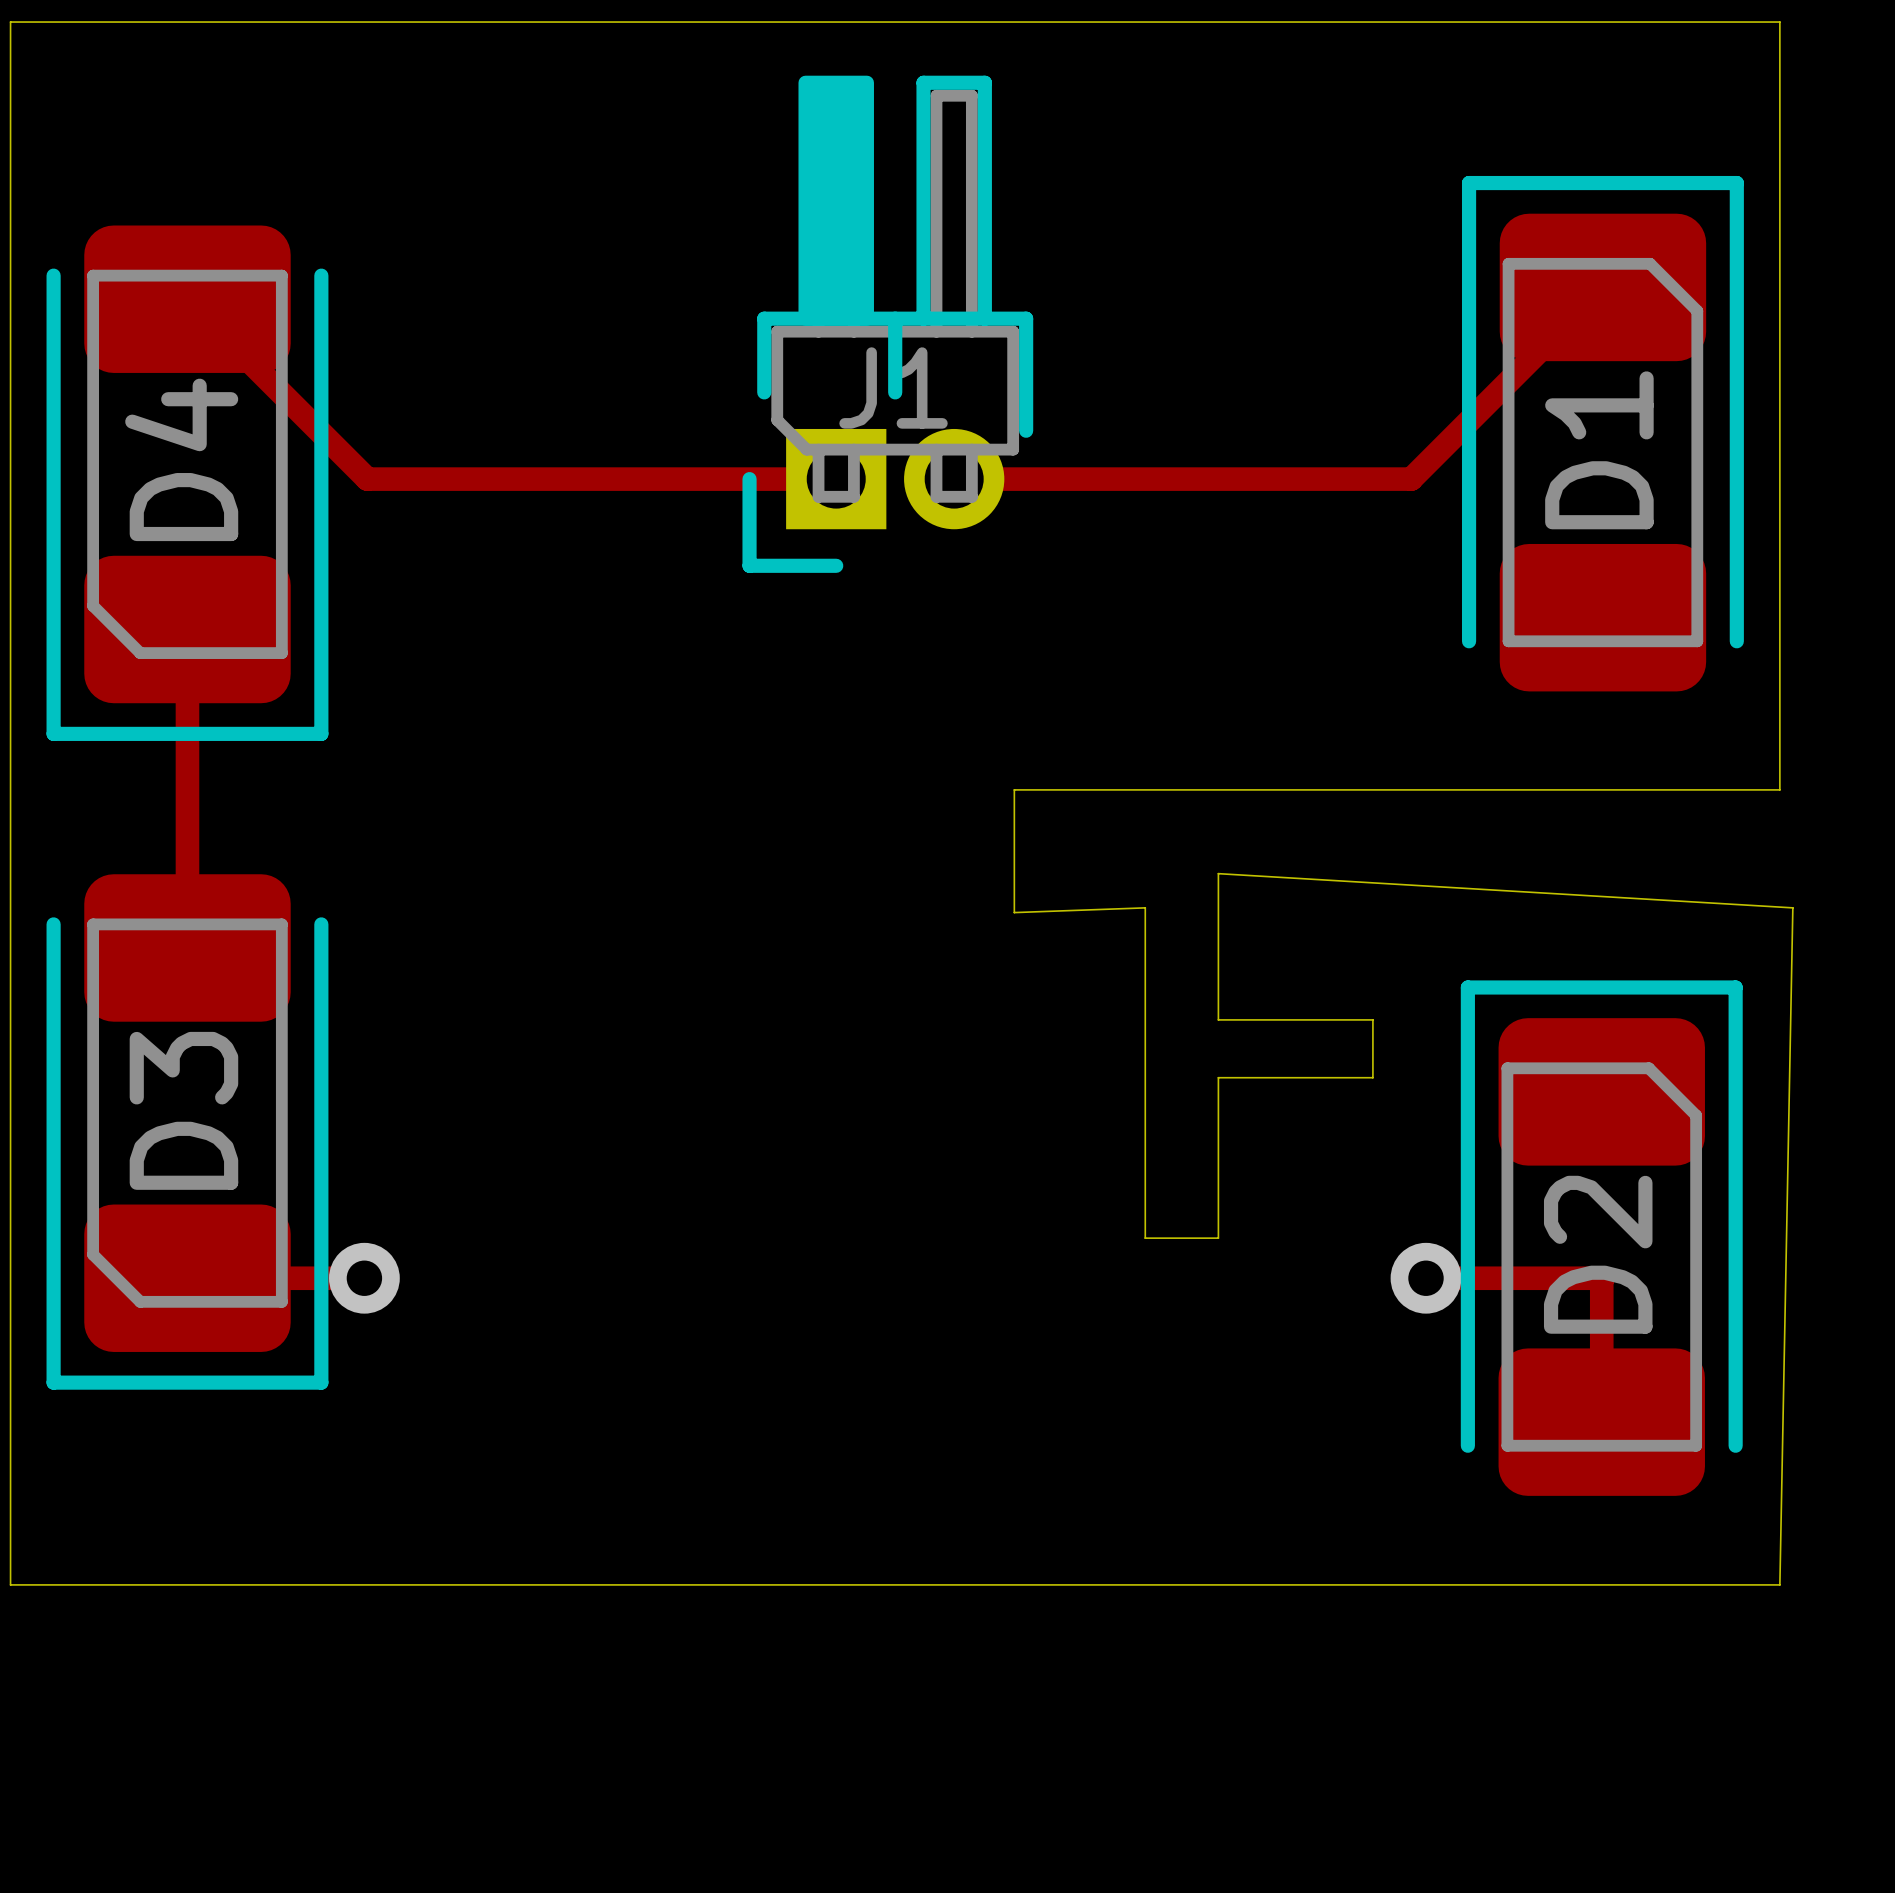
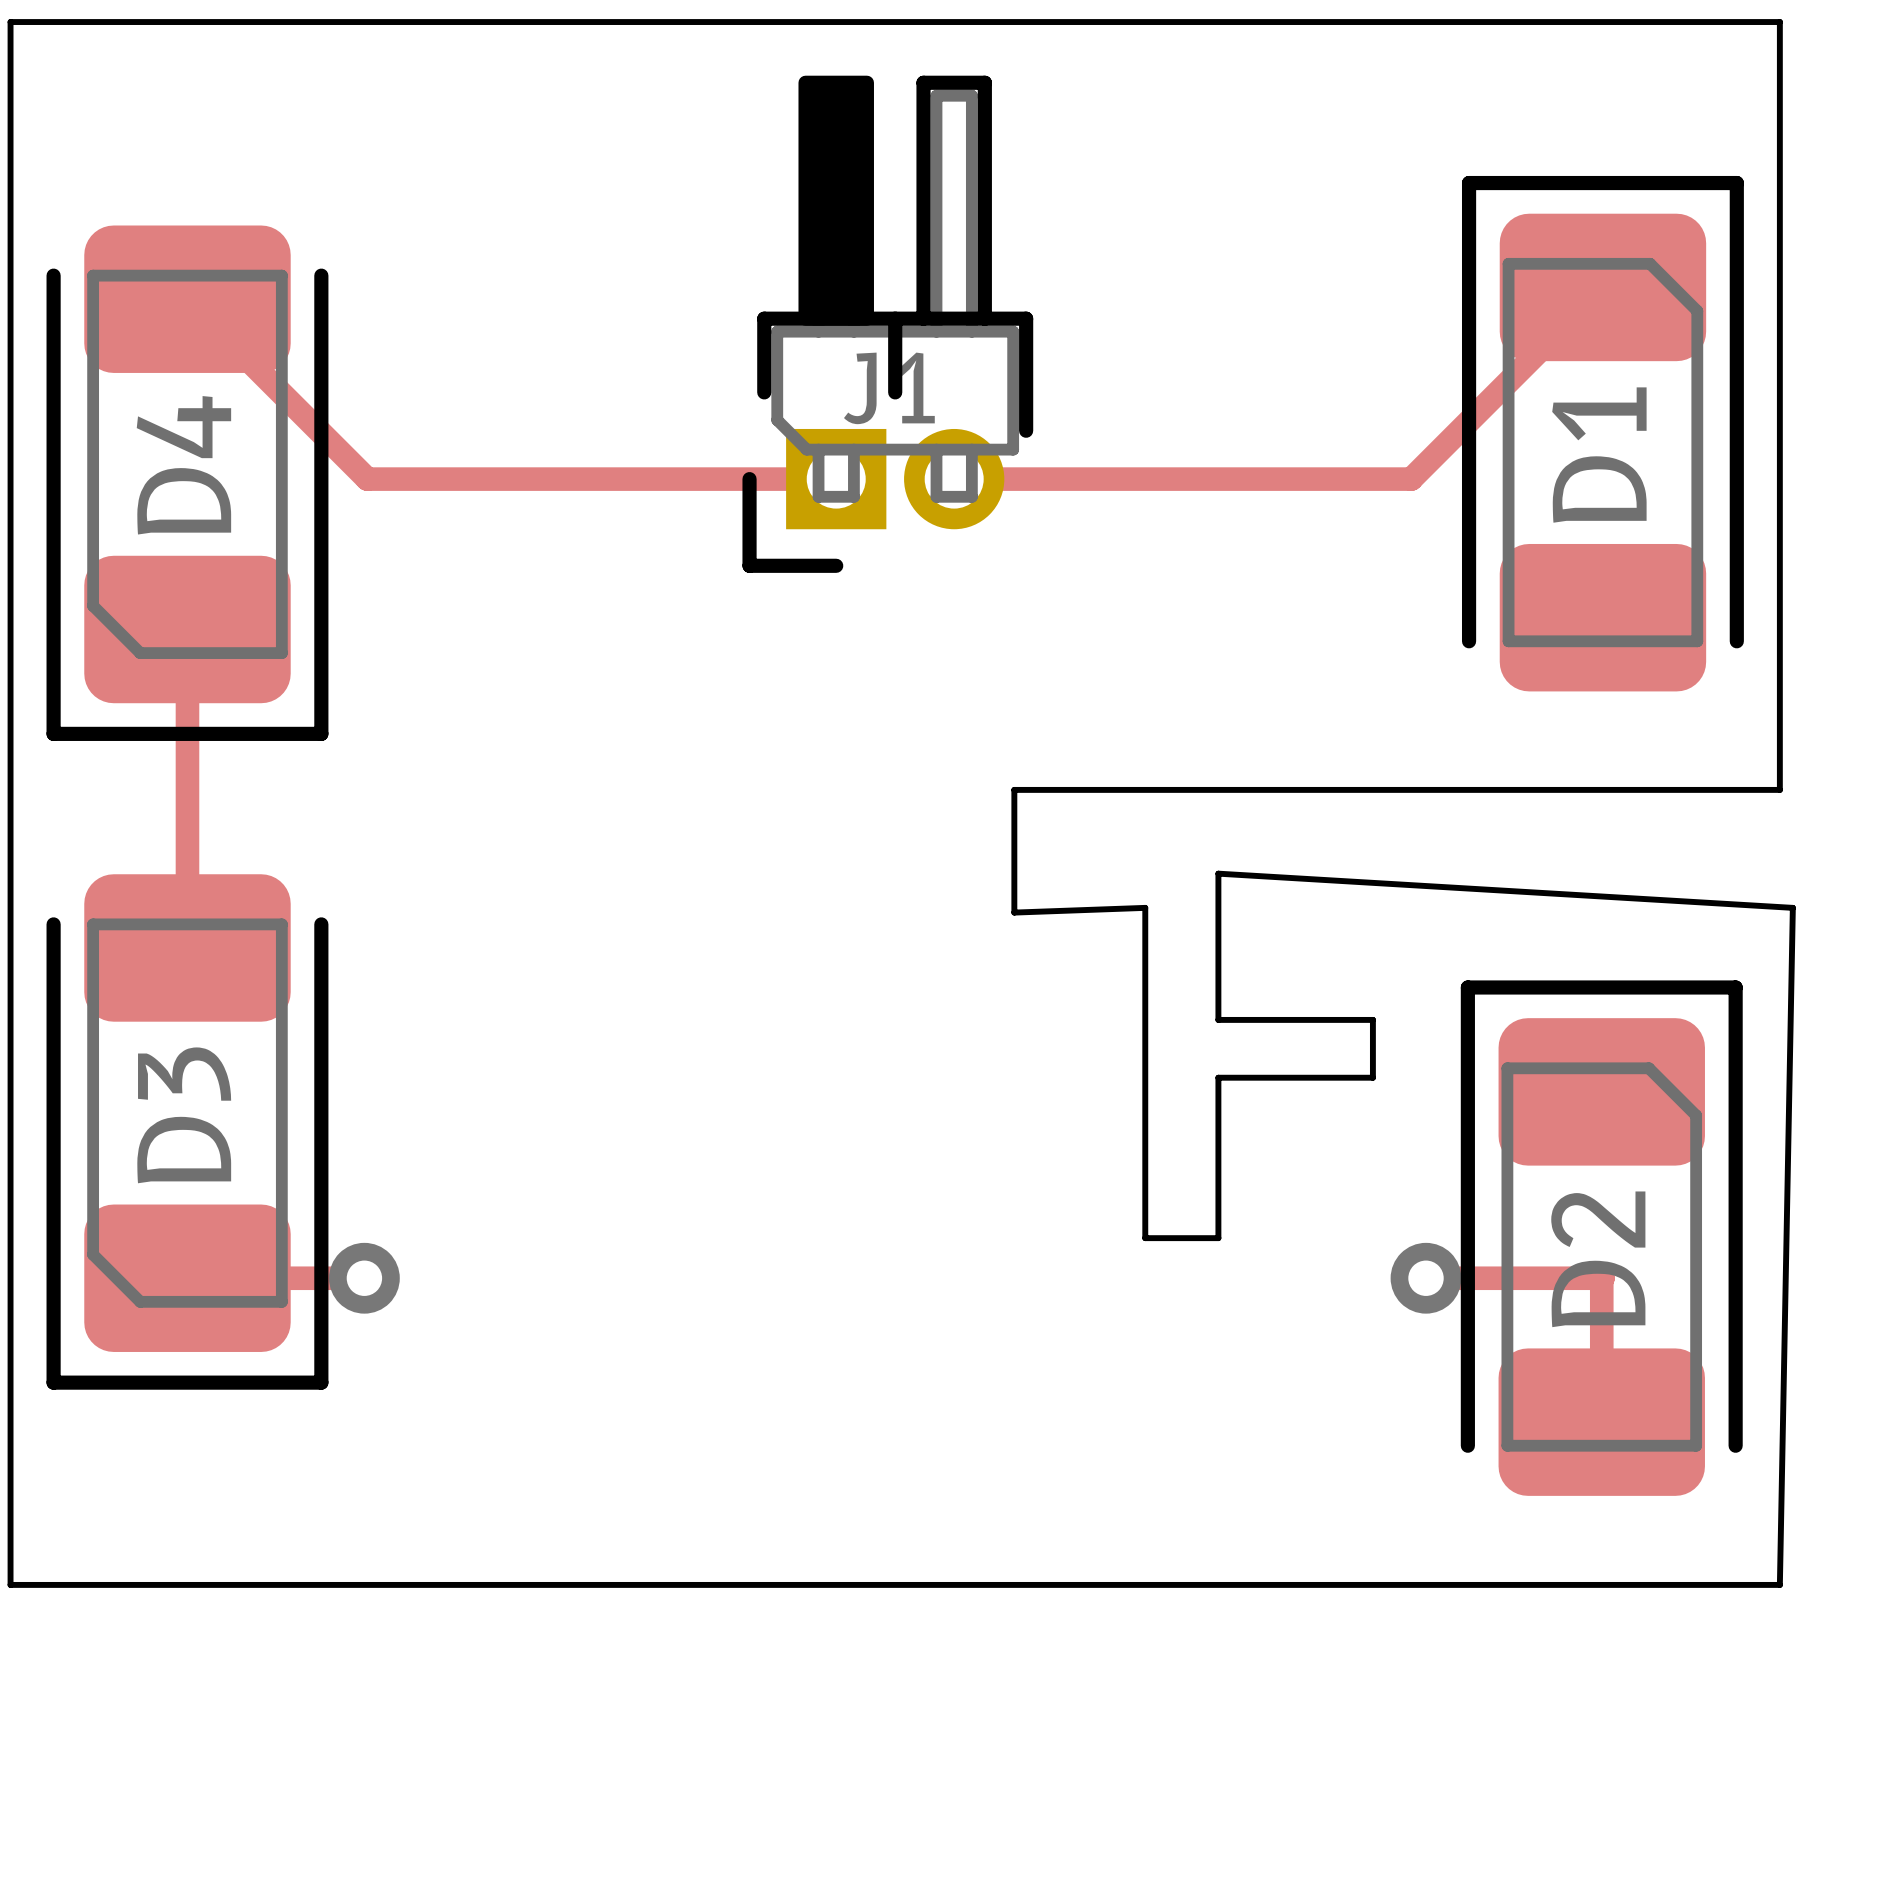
board edge width: thin (10, 22) (1779, 22) (1779, 789) (1014, 789) (1014, 912) (1145, 907) (1145, 1238) (1218, 1238) (1218, 1077) (1372, 1077) (1372, 1019) (1218, 1019) (1218, 873) (1792, 907) (1779, 1584) (10, 1584) (10, 22) -> thick (10, 22) (1779, 22) (1779, 789) (1014, 789) (1014, 912) (1145, 907) (1145, 1238) (1218, 1238) (1218, 1077) (1372, 1077) (1372, 1019) (1218, 1019) (1218, 873) (1792, 907) (1779, 1584) (10, 1584) (10, 22)

